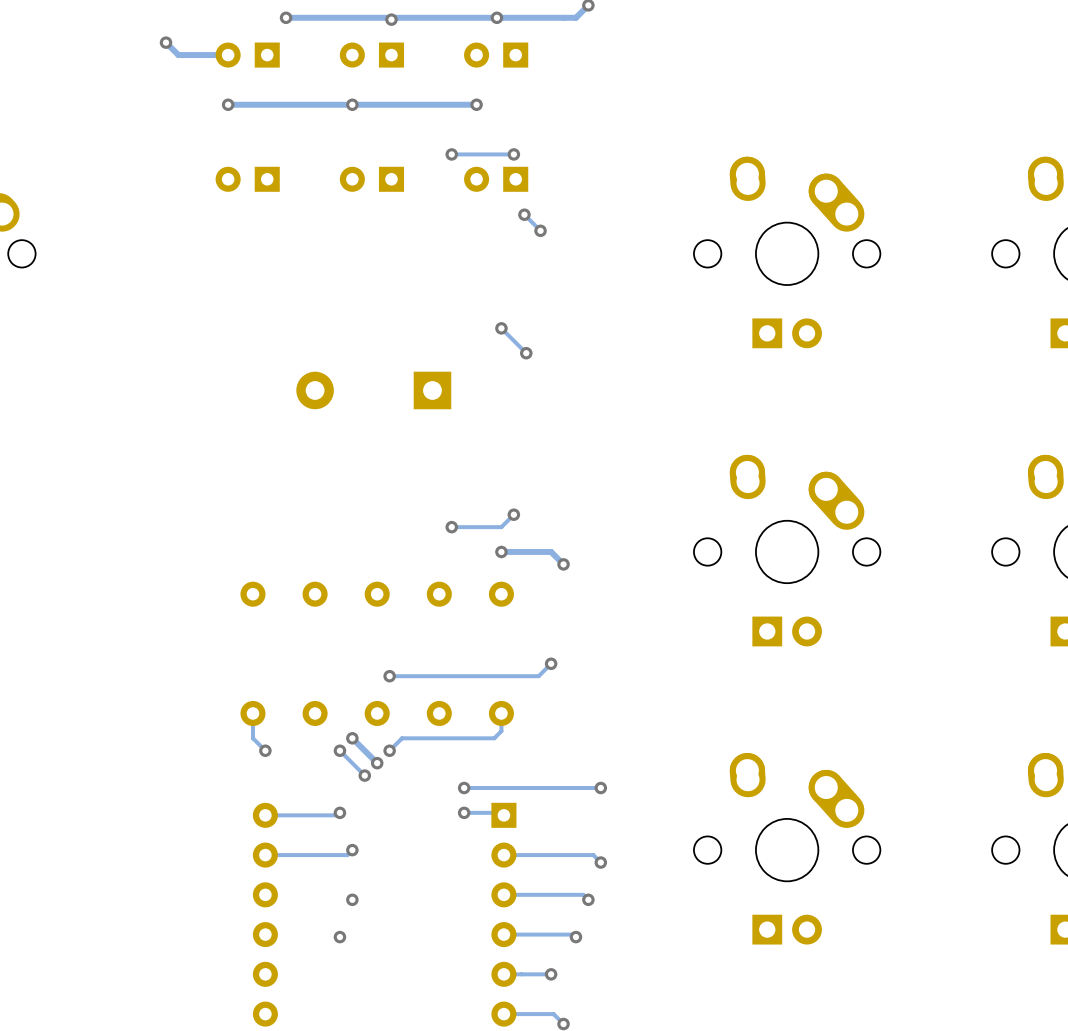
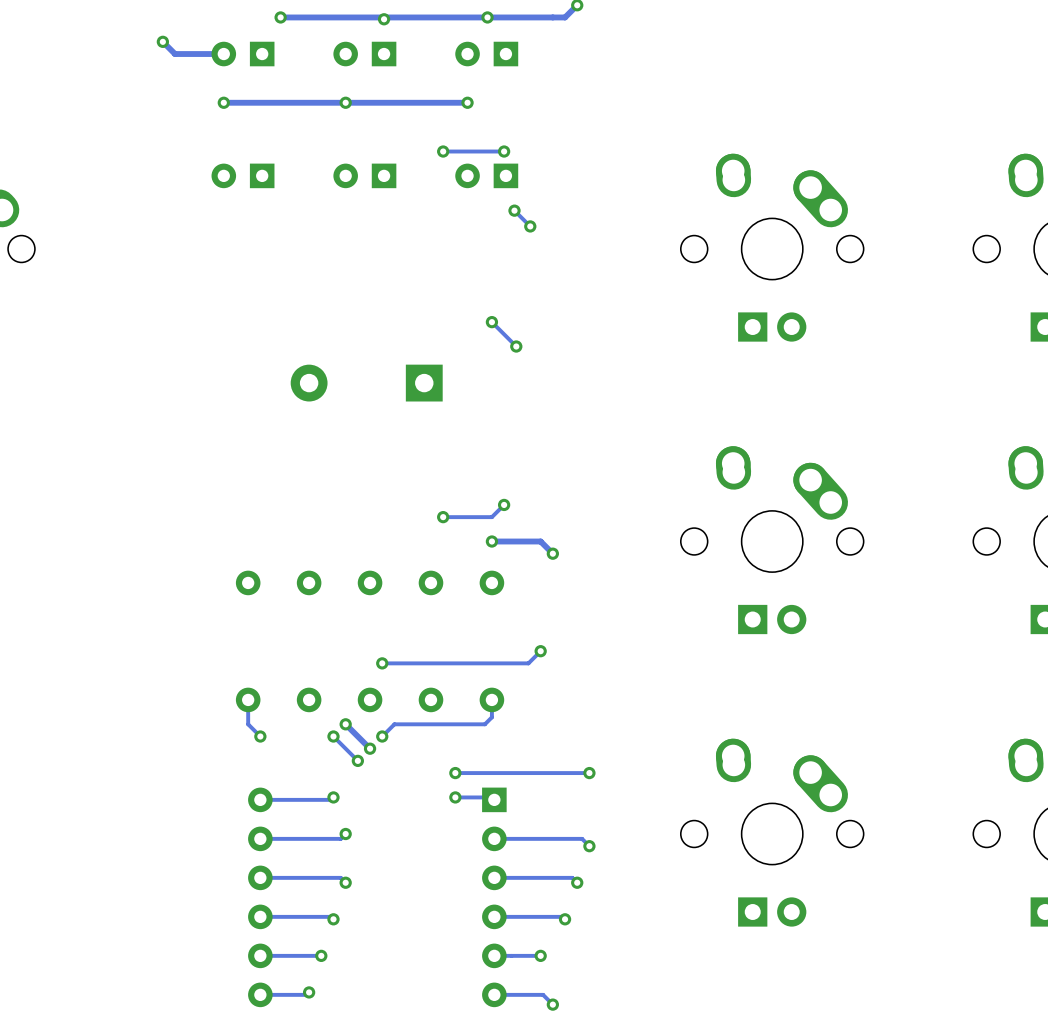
track: none -> (260, 877) (340, 877) (345, 882)
track: none -> (260, 916) (331, 916) (333, 919)
track: none -> (321, 955) (260, 955)
via: none -> (321, 955)
track: none -> (309, 992) (306, 994) (260, 994)
via: none -> (309, 992)

